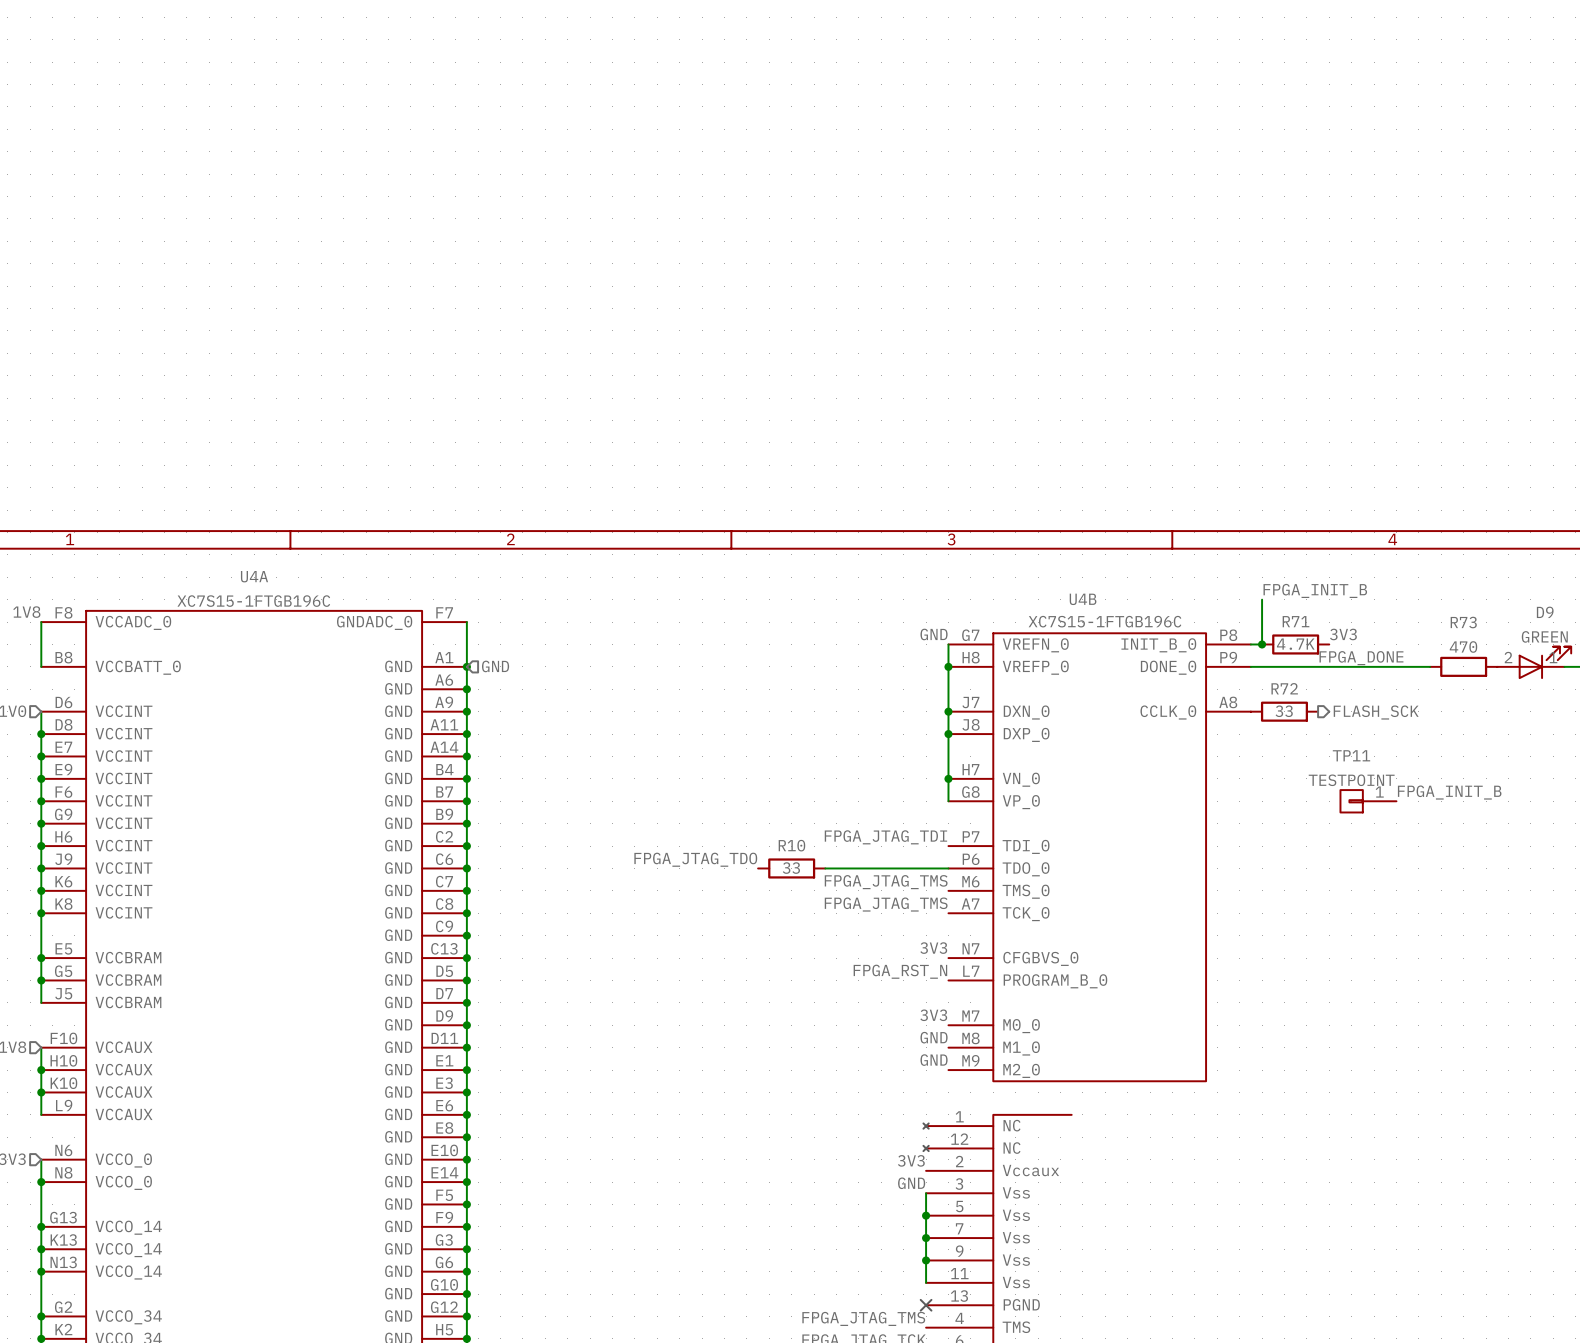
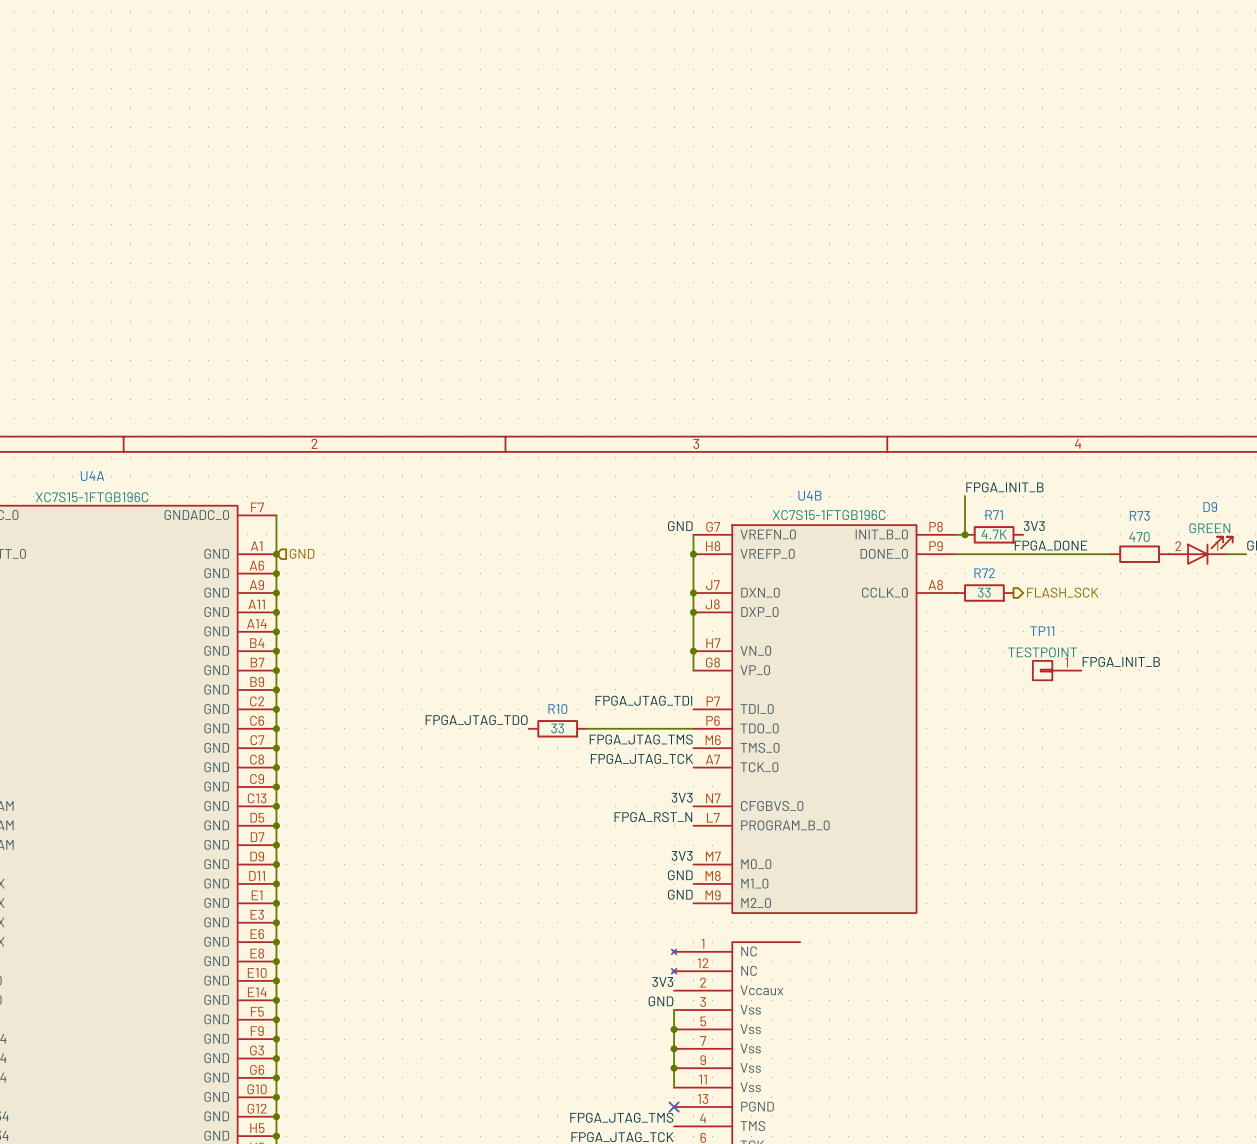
label: FPGA_JTAG_TMS (886, 904) -> FPGA_JTAG_TCK (641, 758)

